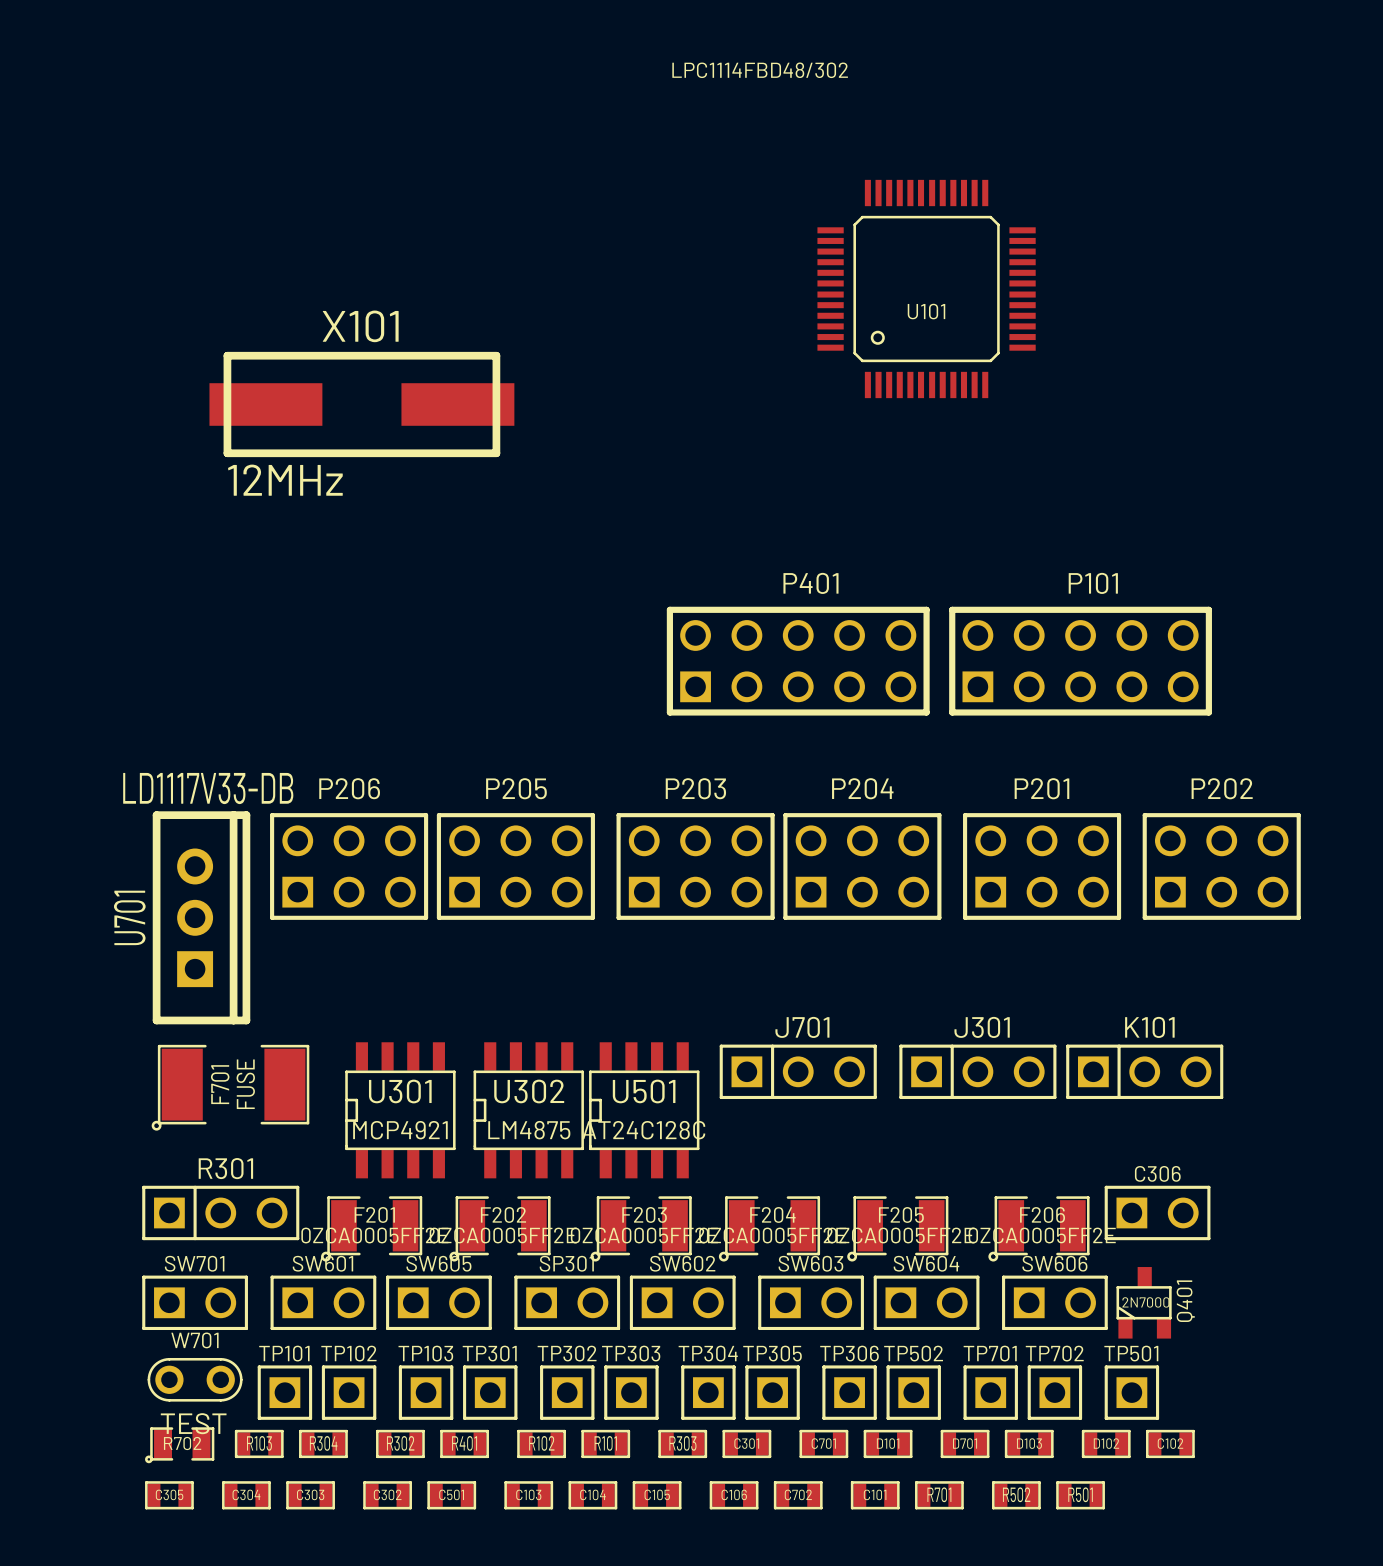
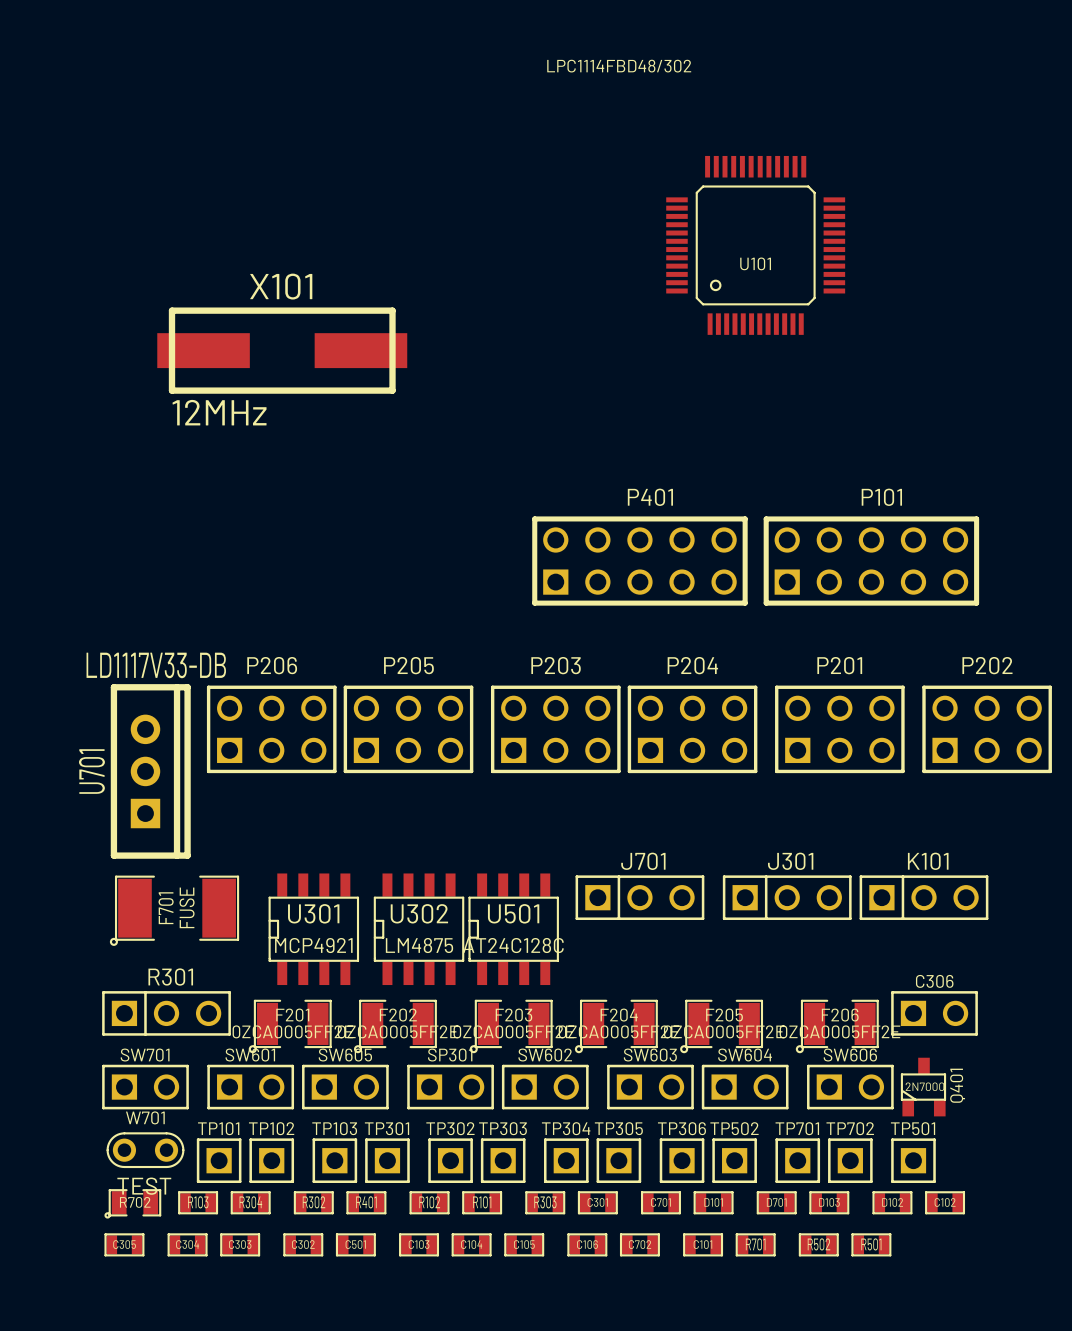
U101 footprint: [817, 179, 1036, 399] -> [666, 155, 846, 335]

